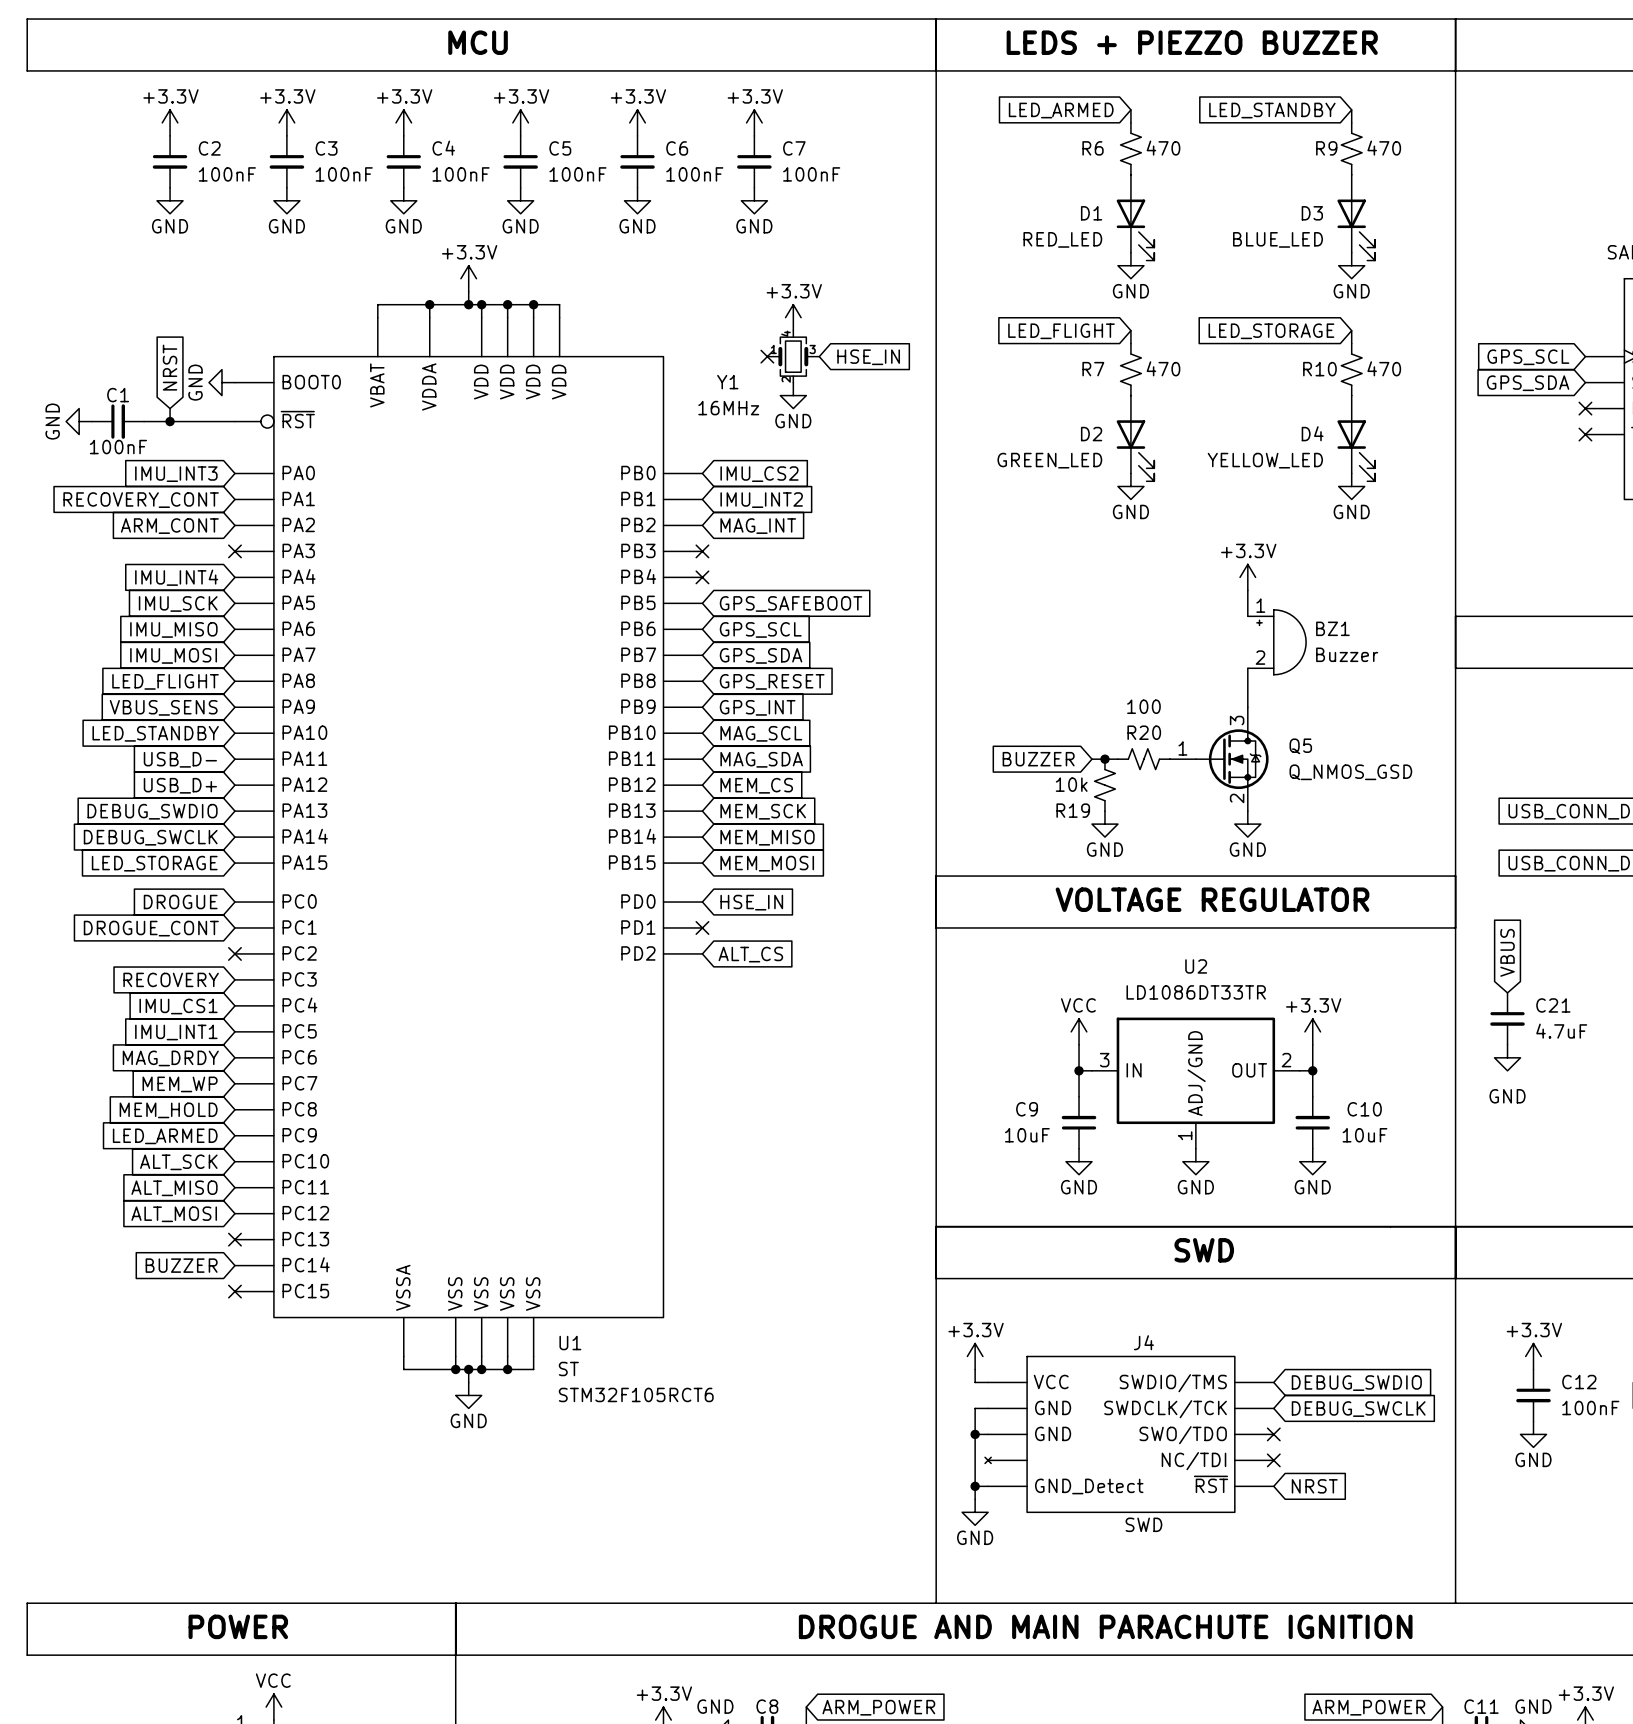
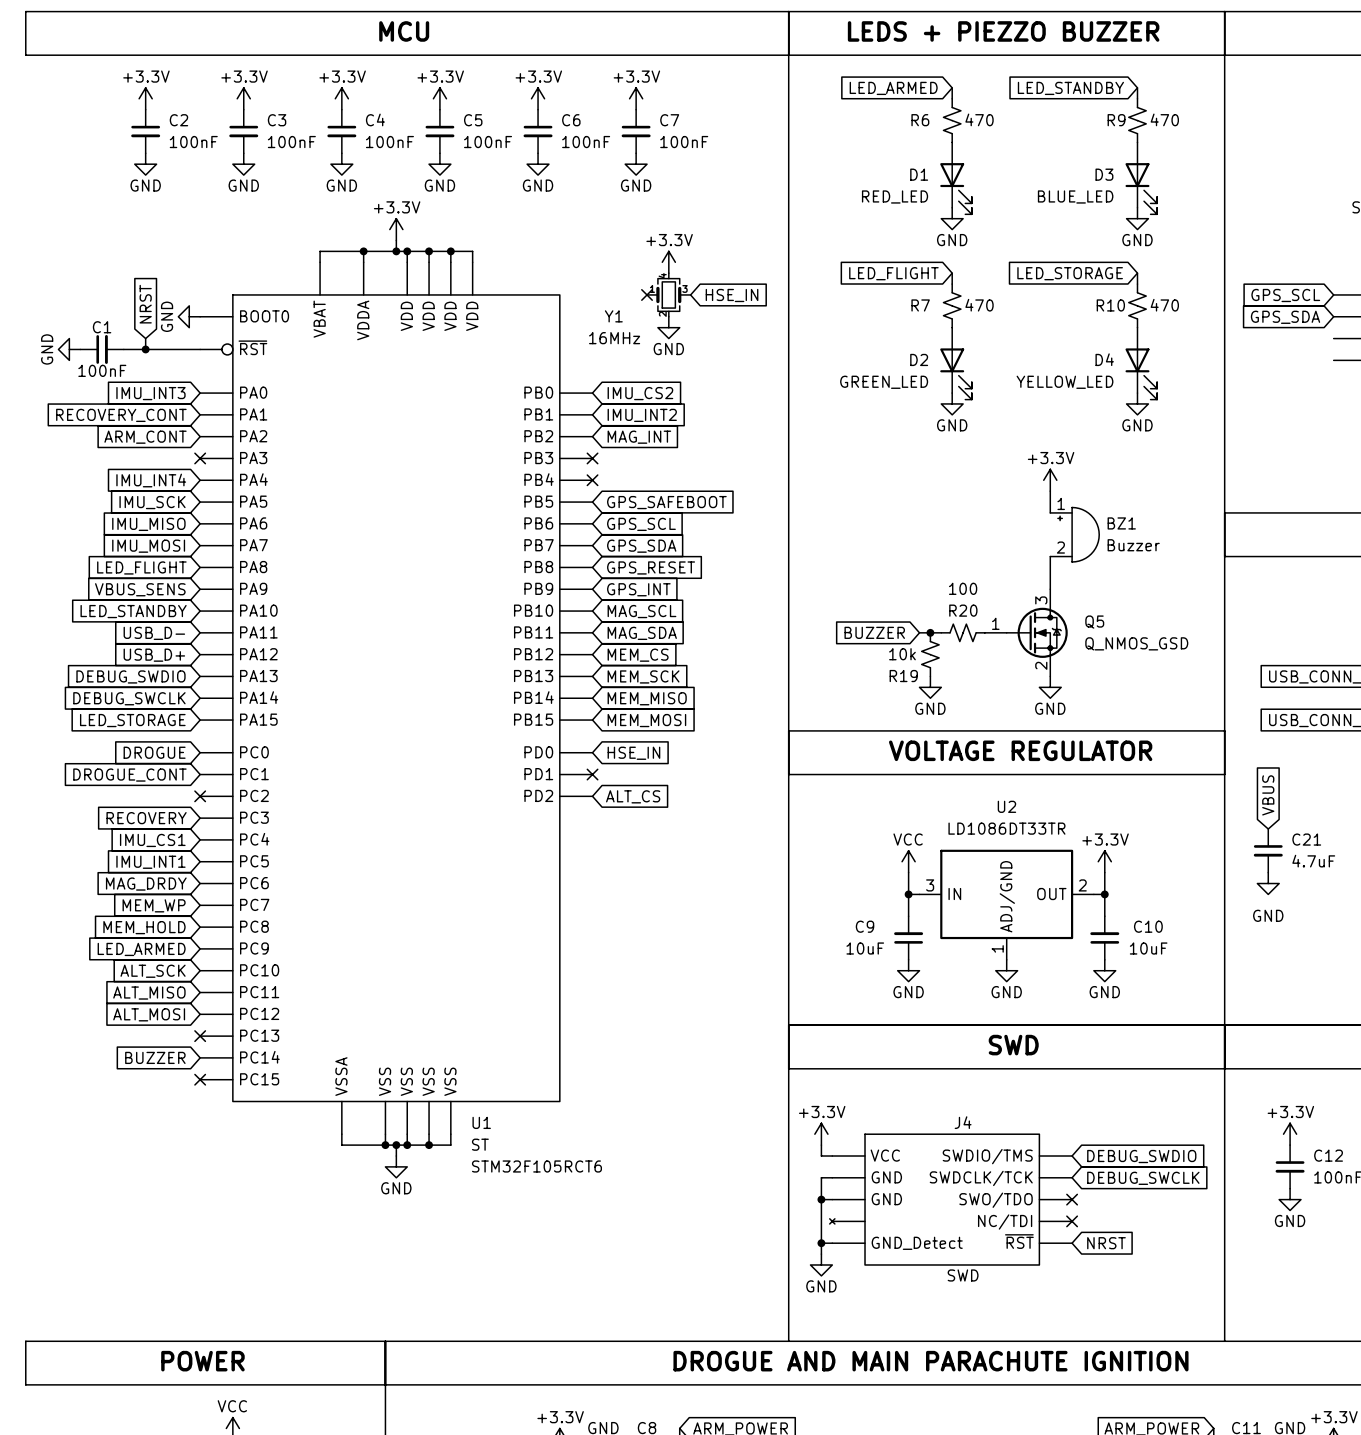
no-connect mark: (1585, 408) -> none
no-connect mark: (1585, 434) -> none

